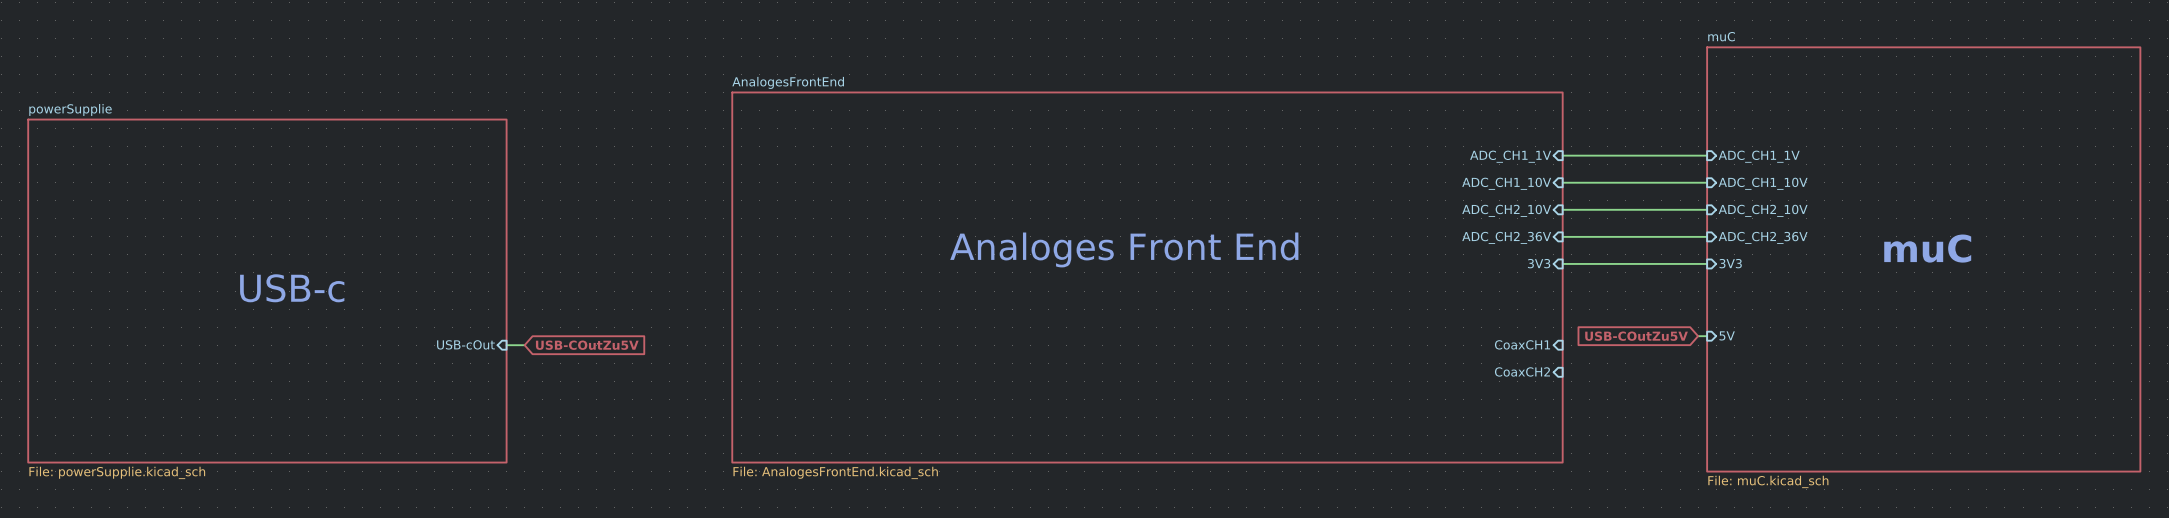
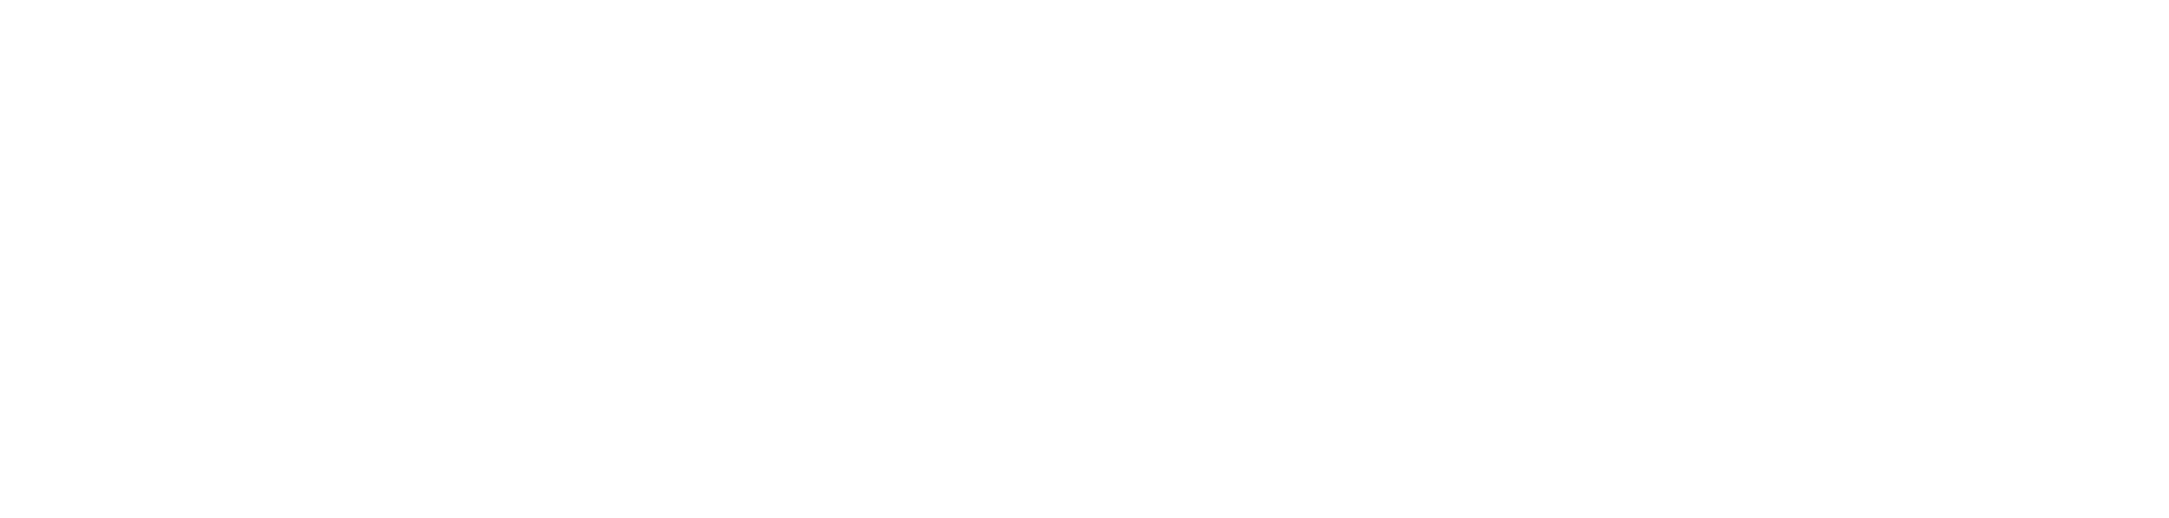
wire: (1562, 155) (1707, 155) -> none
sheet pin: ADC_CH1_1V (1510, 156) -> none
sheet pin: ADC_CH1_1V (1759, 156) -> none
wire: (1562, 182) (1707, 182) -> none
sheet pin: ADC_CH1_10V (1506, 183) -> none
sheet pin: ADC_CH1_10V (1763, 183) -> none
wire: (1562, 209) (1707, 209) -> none
sheet pin: ADC_CH2_10V (1506, 210) -> none
sheet pin: ADC_CH2_10V (1763, 210) -> none
wire: (1562, 236) (1707, 236) -> none
sheet pin: ADC_CH2_36V (1506, 237) -> none
sheet pin: ADC_CH2_36V (1763, 237) -> none
text: muC (1927, 248) -> none
text: Analoges Front End (1124, 249) -> none
sheet muC: File: muC.kicad_sch (1923, 259) -> none
sheet pin: 3V3 (1539, 263) -> none
wire: (1562, 263) (1707, 263) -> none
sheet pin: 3V3 (1730, 263) -> none
sheet AnalogesFrontEnd: File: AnalogesFrontEnd.kicad_sch (1147, 277) -> none
text: USB-c (292, 288) -> none
sheet powerSupplie: File: powerSupplie.kicad_sch (267, 291) -> none
sheet pin: 5V (1727, 335) -> none
global label: USB-COutZu5V (1636, 336) -> none
wire: (1698, 336) (1707, 336) -> none
sheet pin: USB-cOut (465, 344) -> none
sheet pin: CoaxCH1 (1522, 344) -> none
wire: (506, 345) (524, 345) -> none
global label: USB-COutZu5V (587, 345) -> none
sheet pin: CoaxCH2 (1522, 371) -> none

